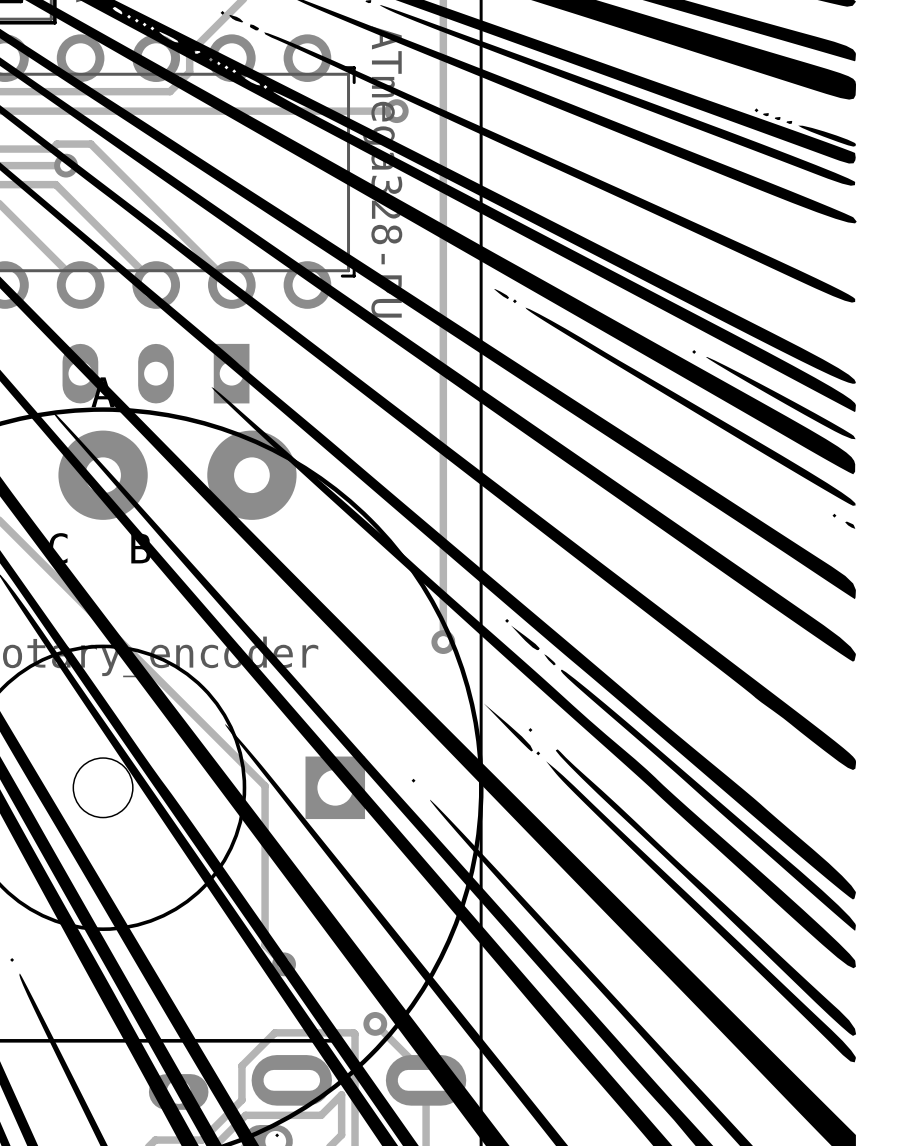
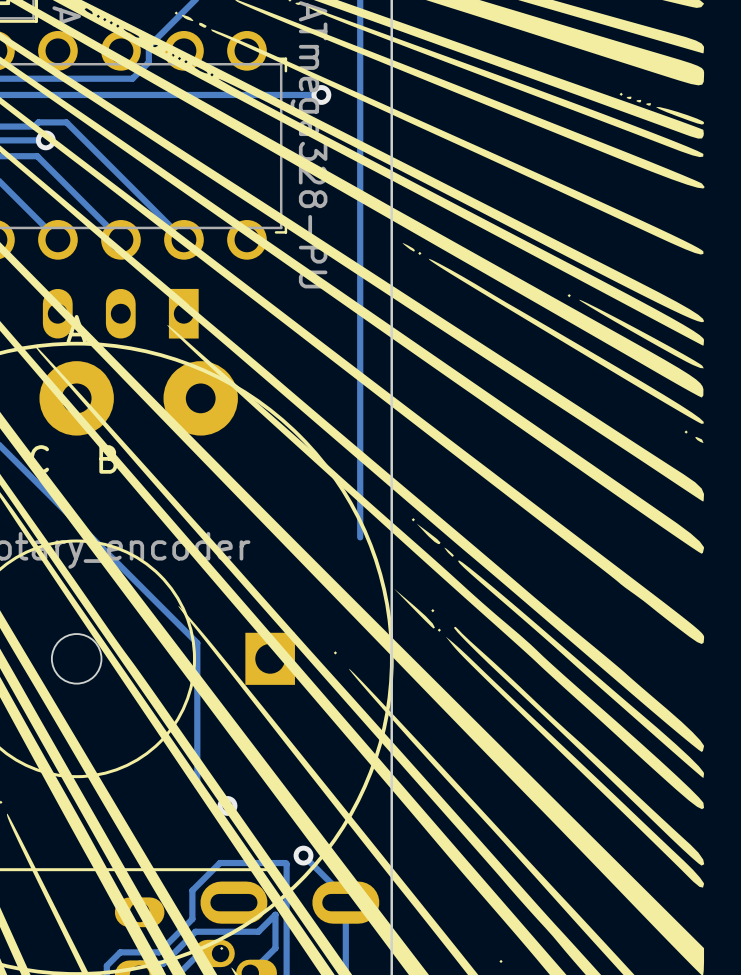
via: (443, 642) -> none
track: (247, 768) (265, 786) (265, 945) (284, 964) -> (197, 643) (197, 785)

